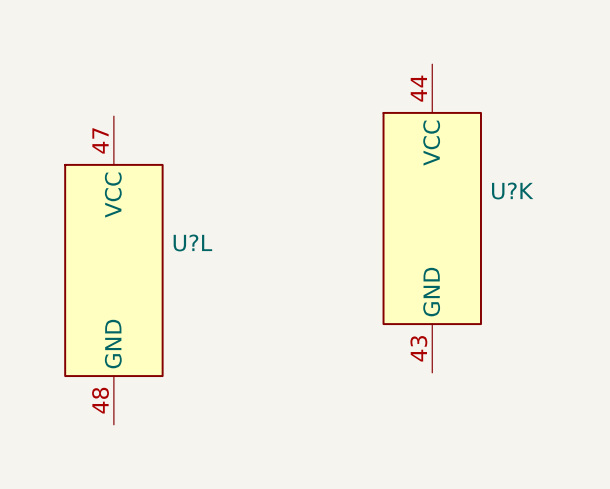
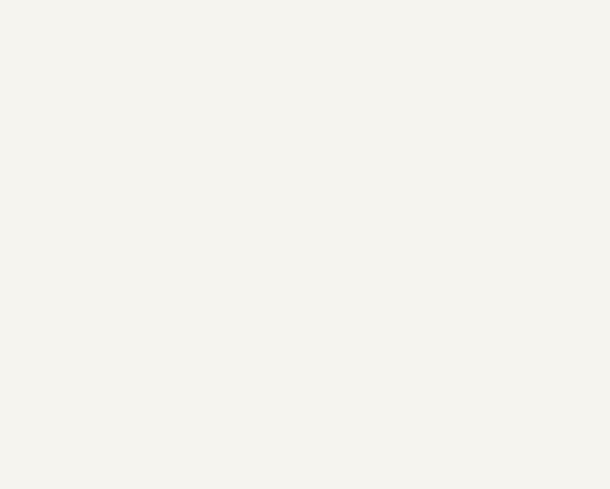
U?K: (432, 218) -> none
U?L: (113, 270) -> none

